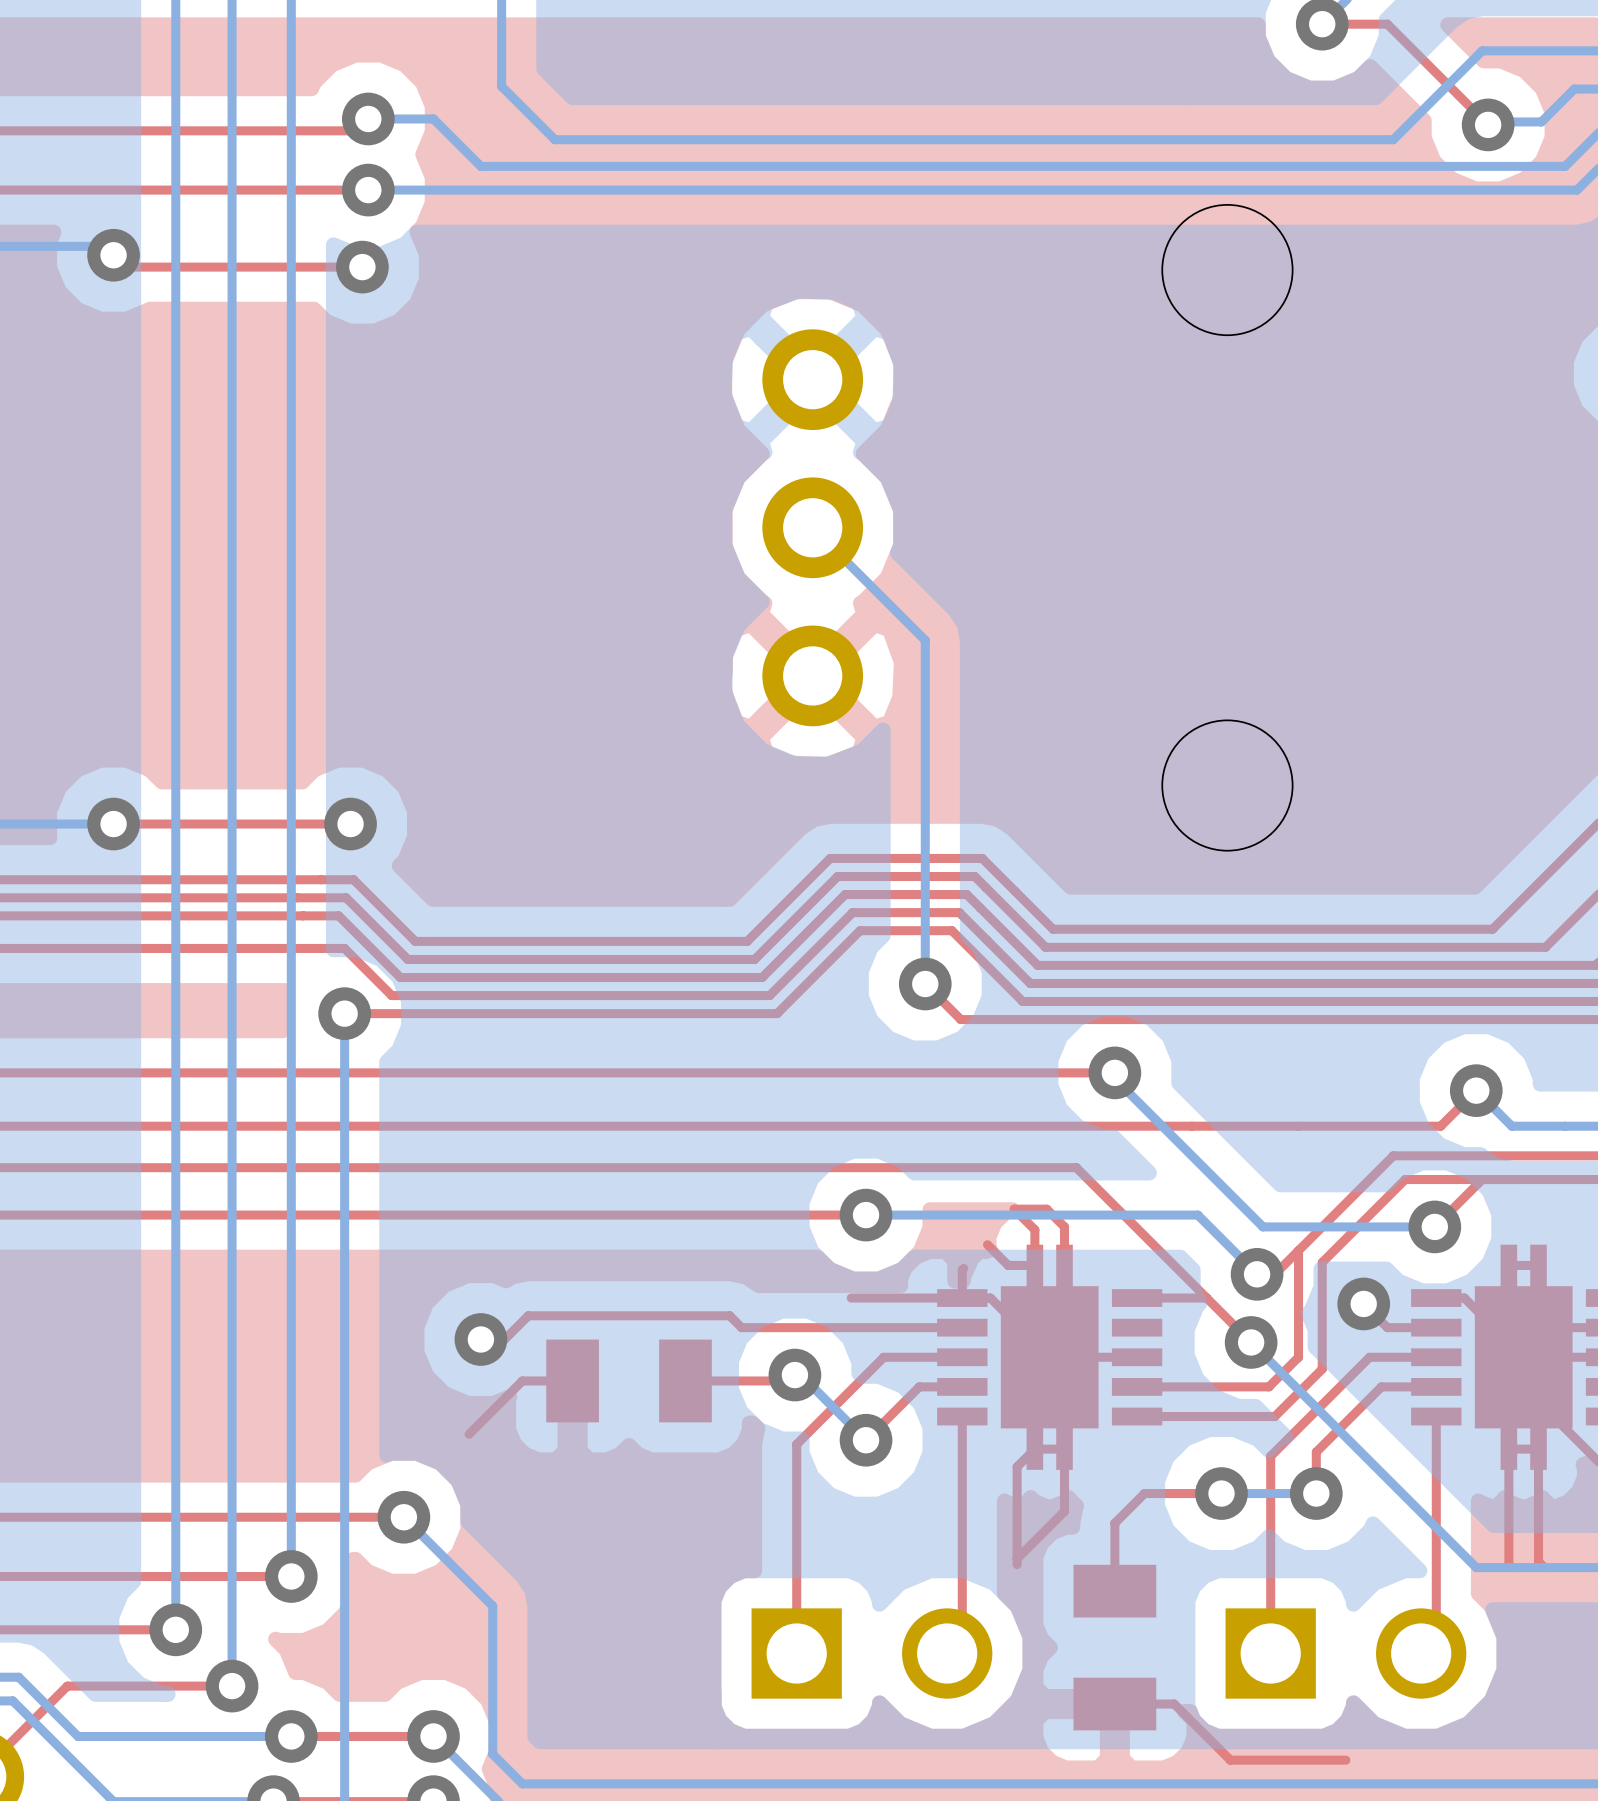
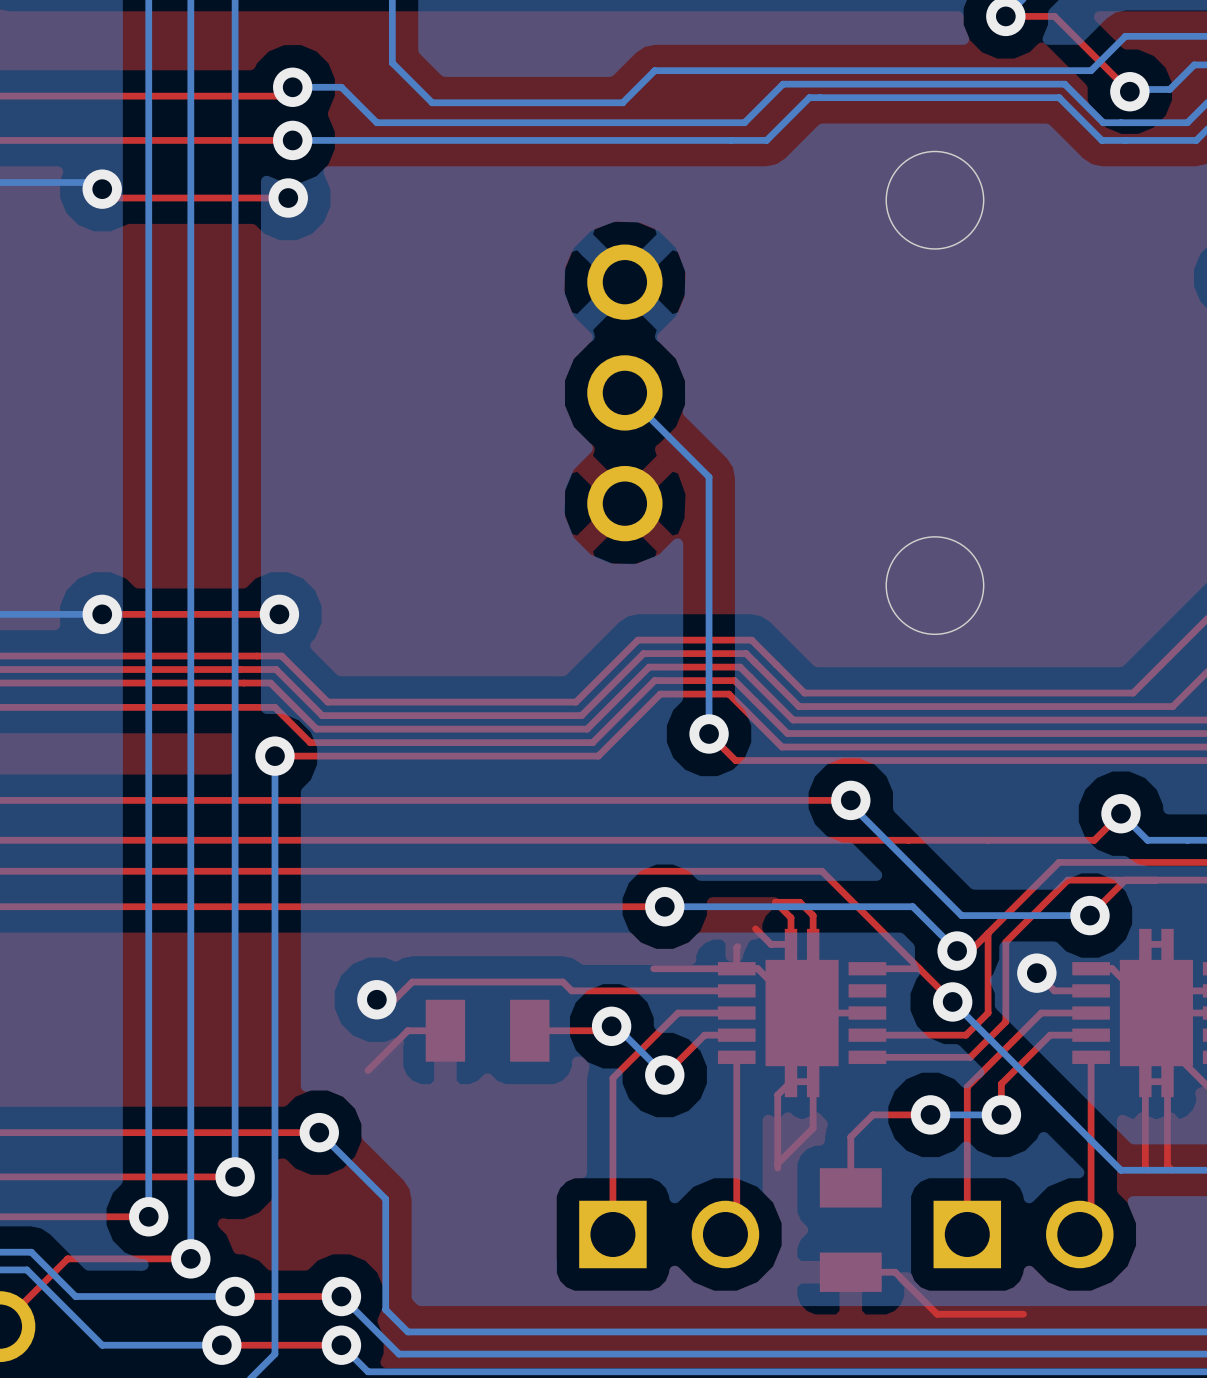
bottom track: (1436, 96) (1393, 139) (809, 139) -> (1091, 70) (654, 70) (622, 102)
bottom track: (1452, 166) (972, 166) -> (1103, 122) (1064, 84) (783, 84) (744, 122)
bottom track: (1450, 190) (1002, 190) -> (1101, 140) (1059, 97) (809, 97) (766, 140)

